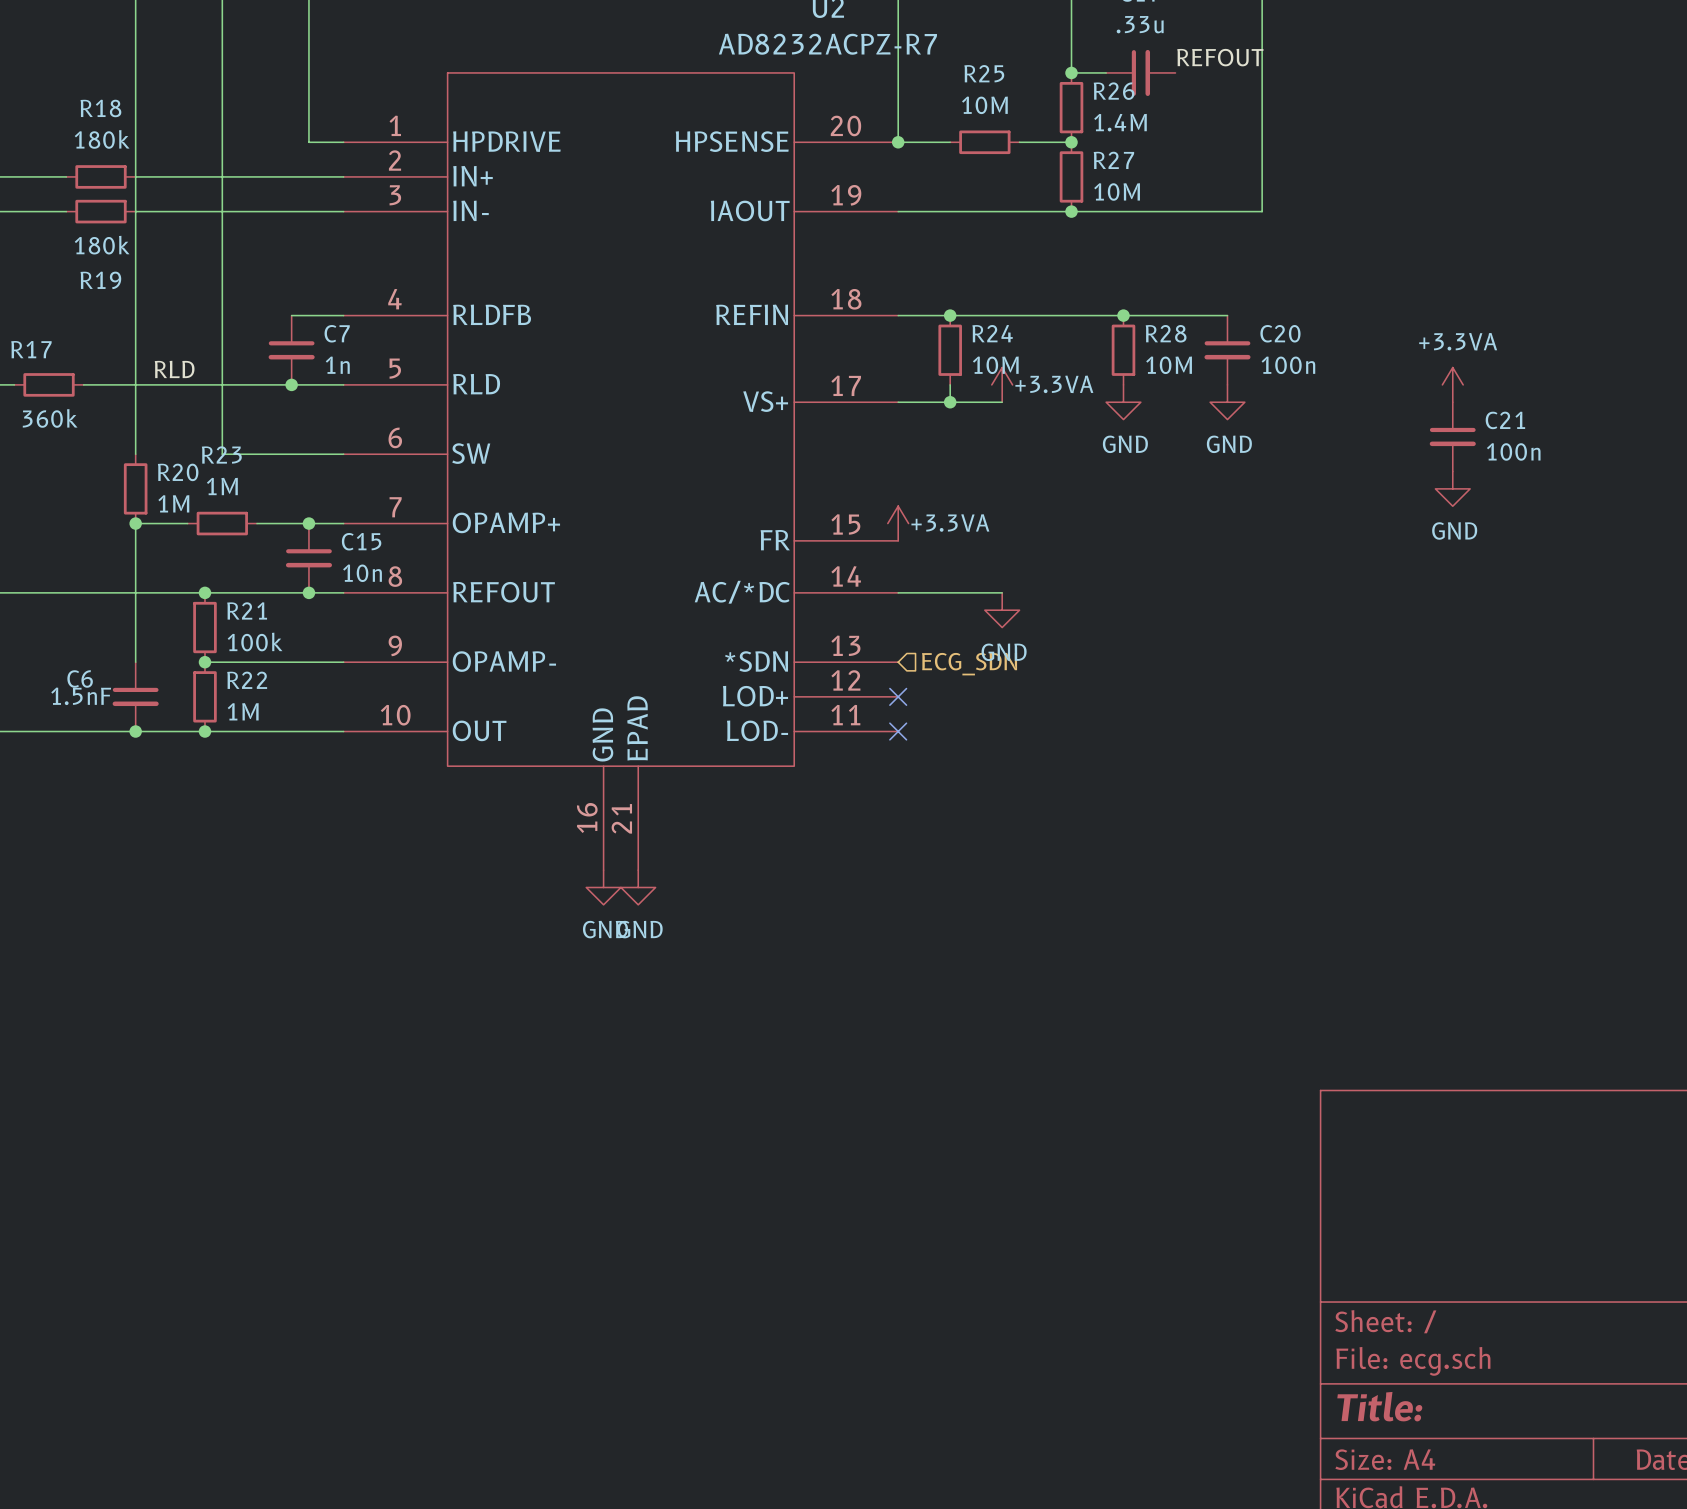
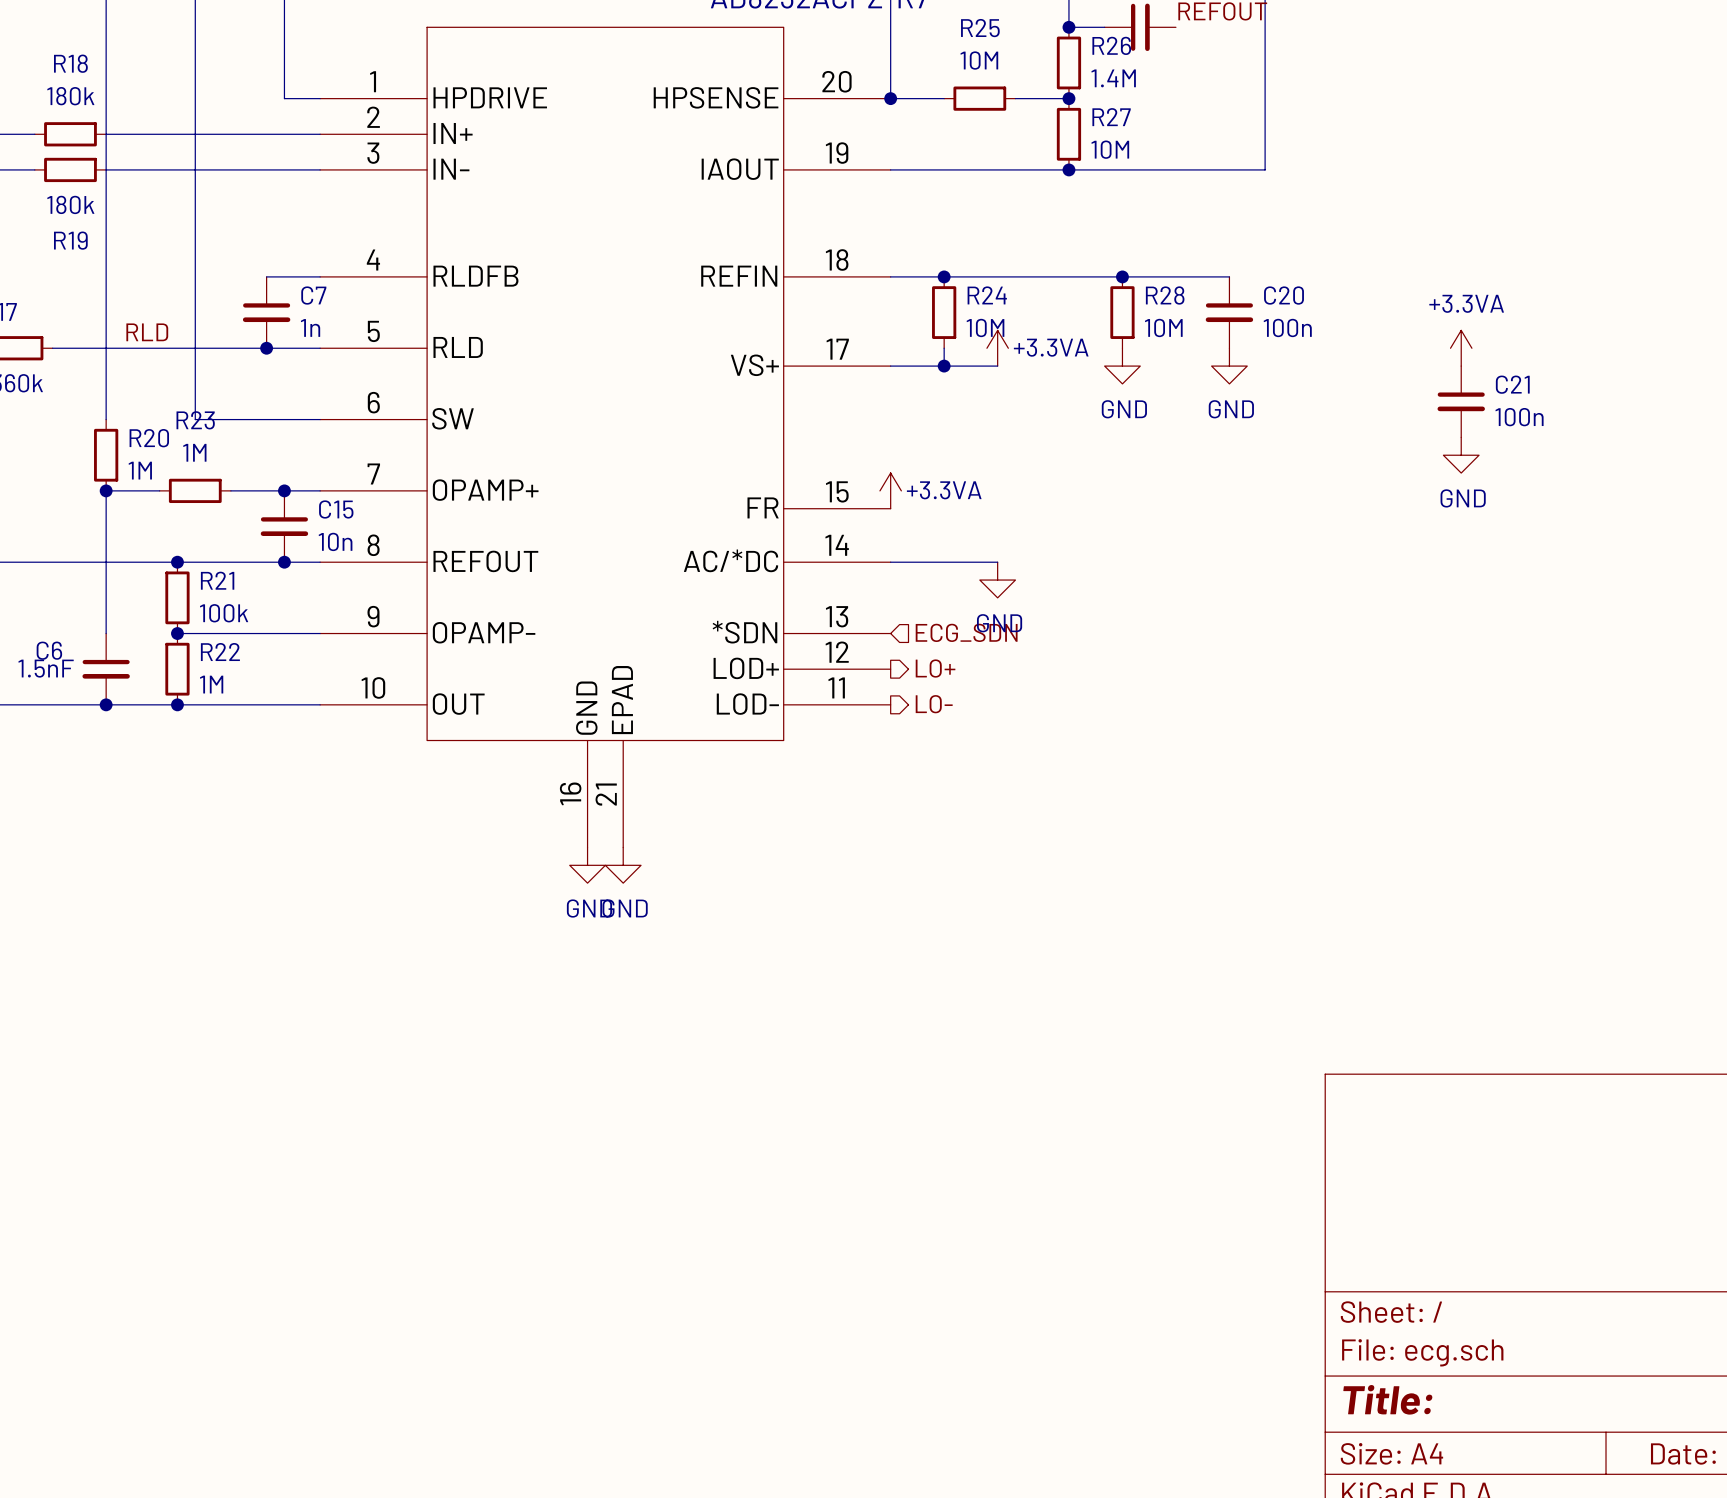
no-connect mark: (898, 696) -> none
hierarchical label: none -> LO+ (935, 668)
hierarchical label: none -> LO- (934, 704)
no-connect mark: (898, 731) -> none

